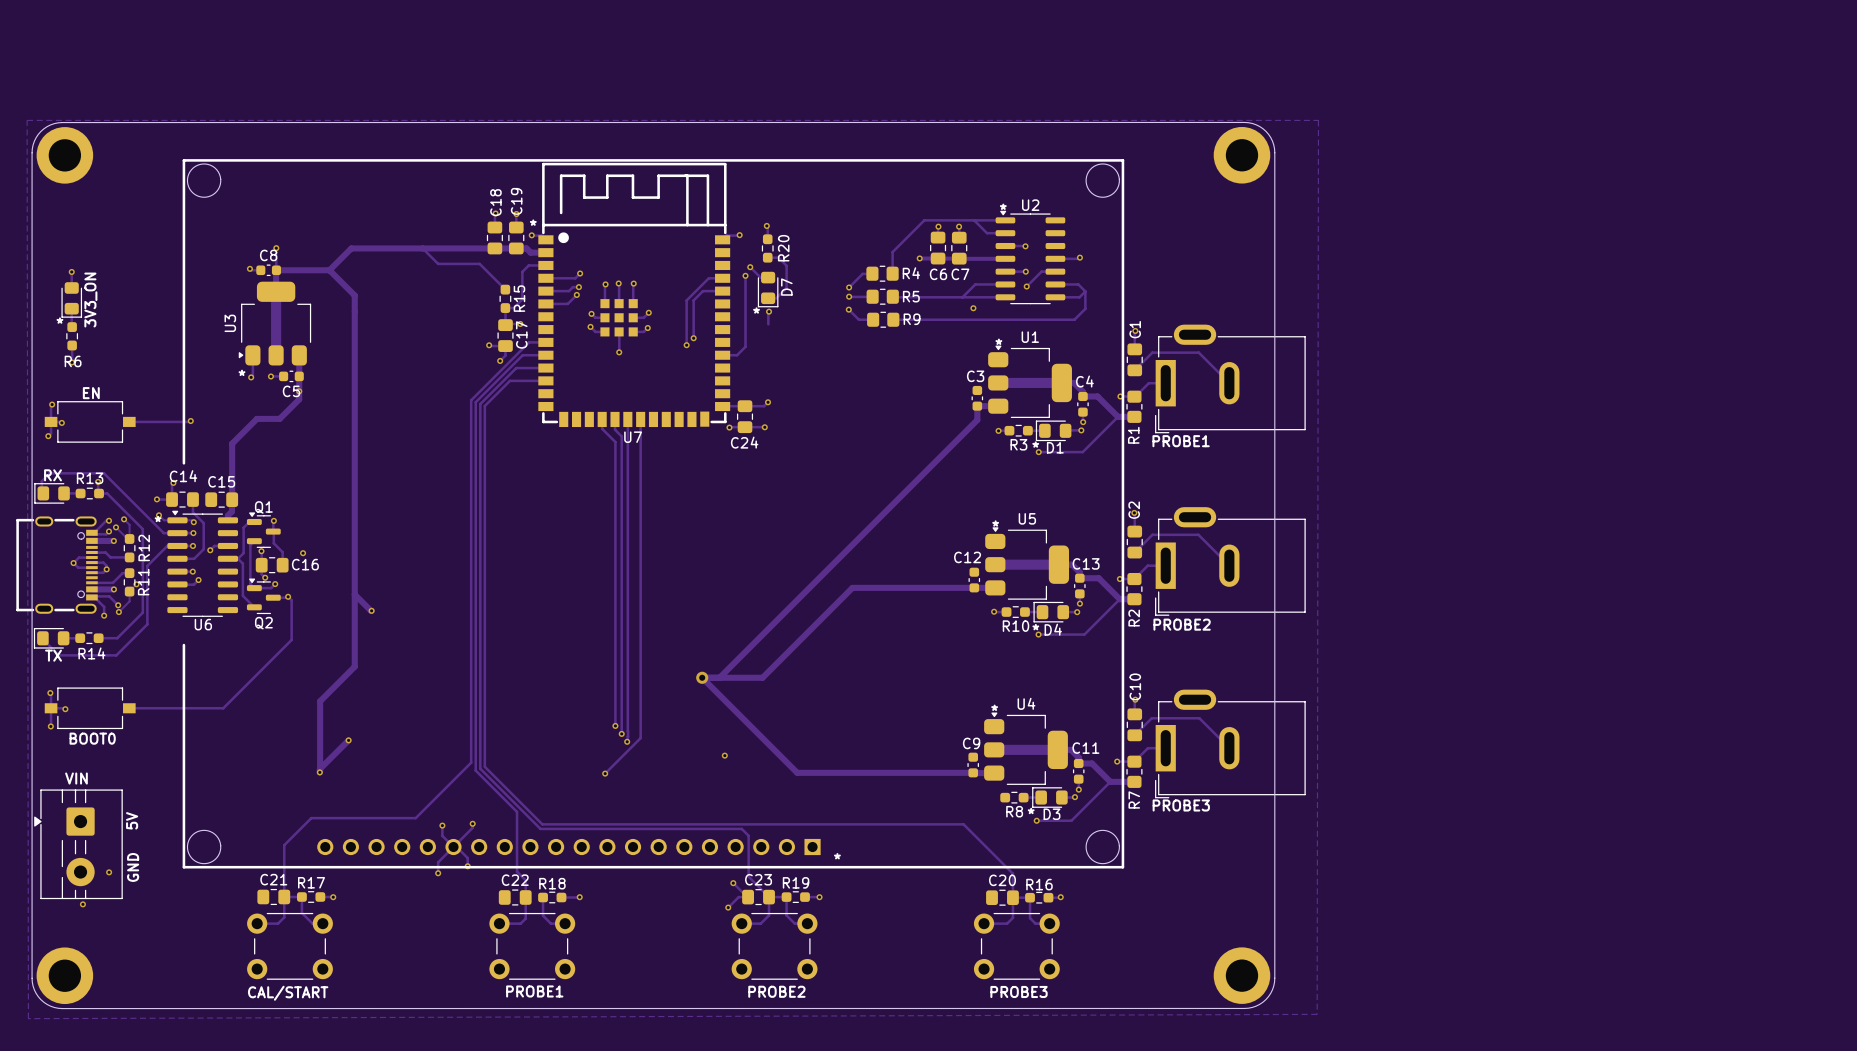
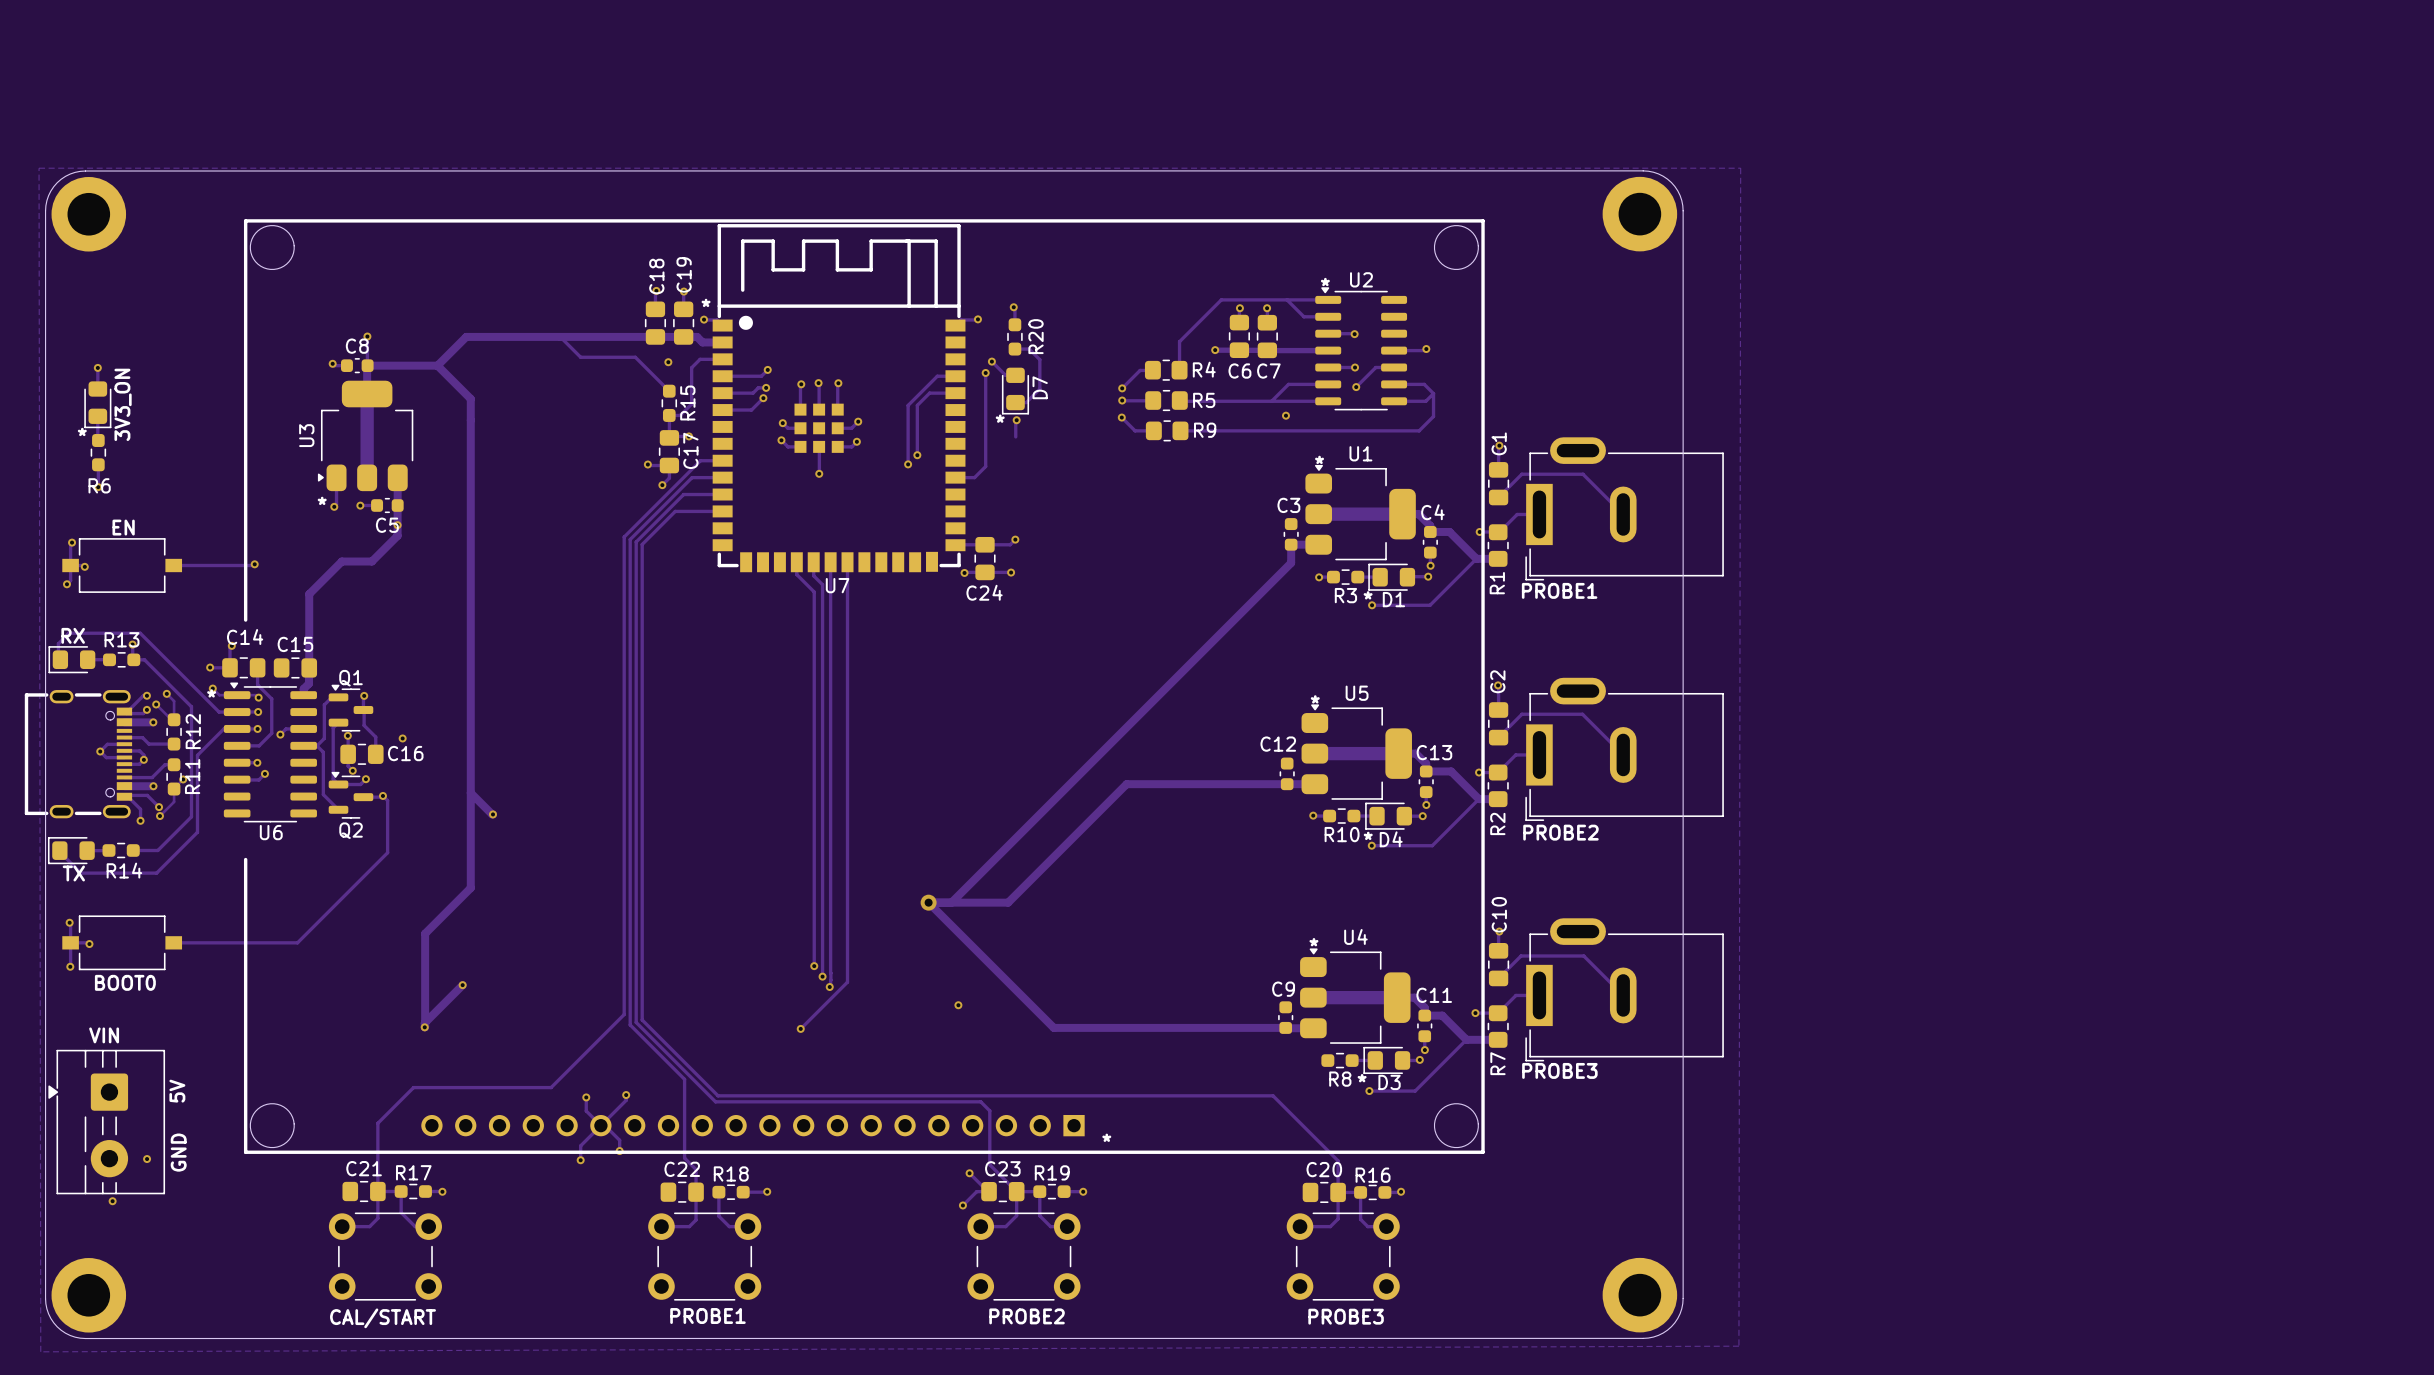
via: none -> (668, 362)

